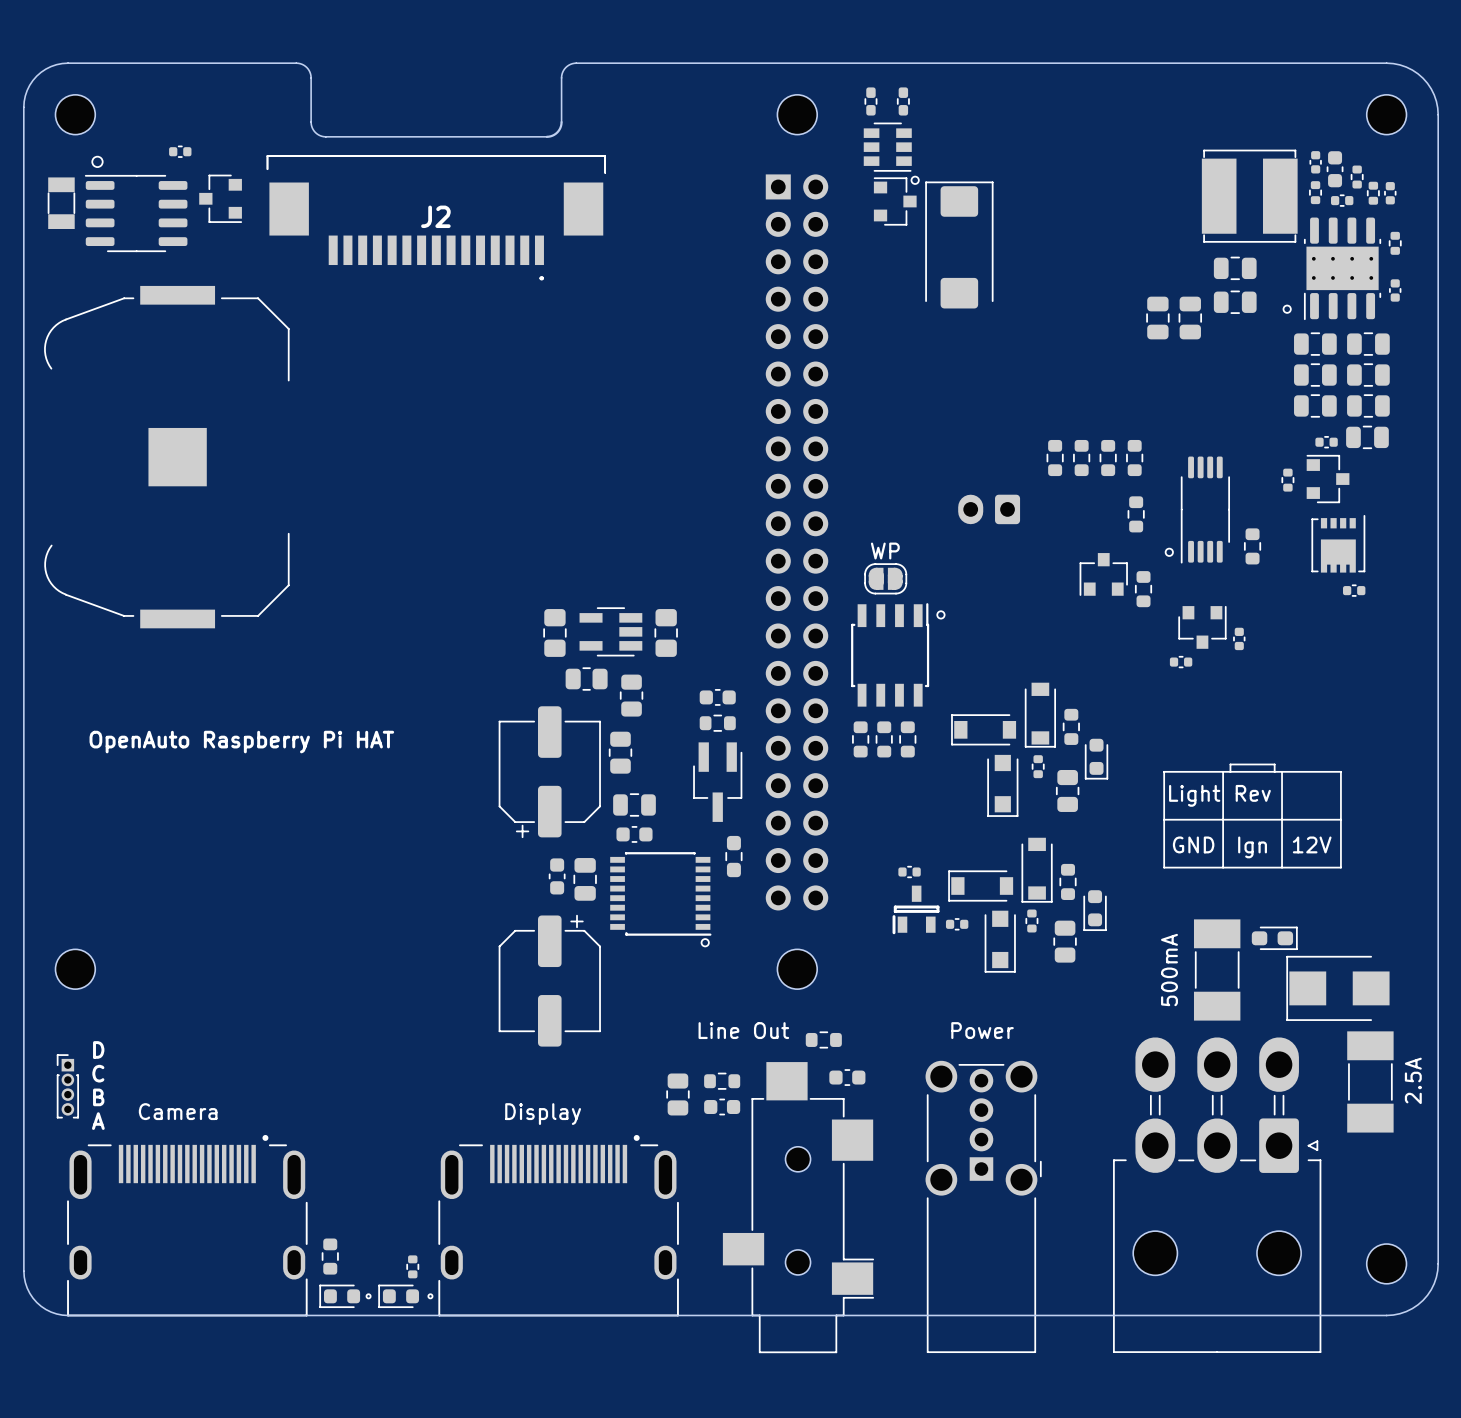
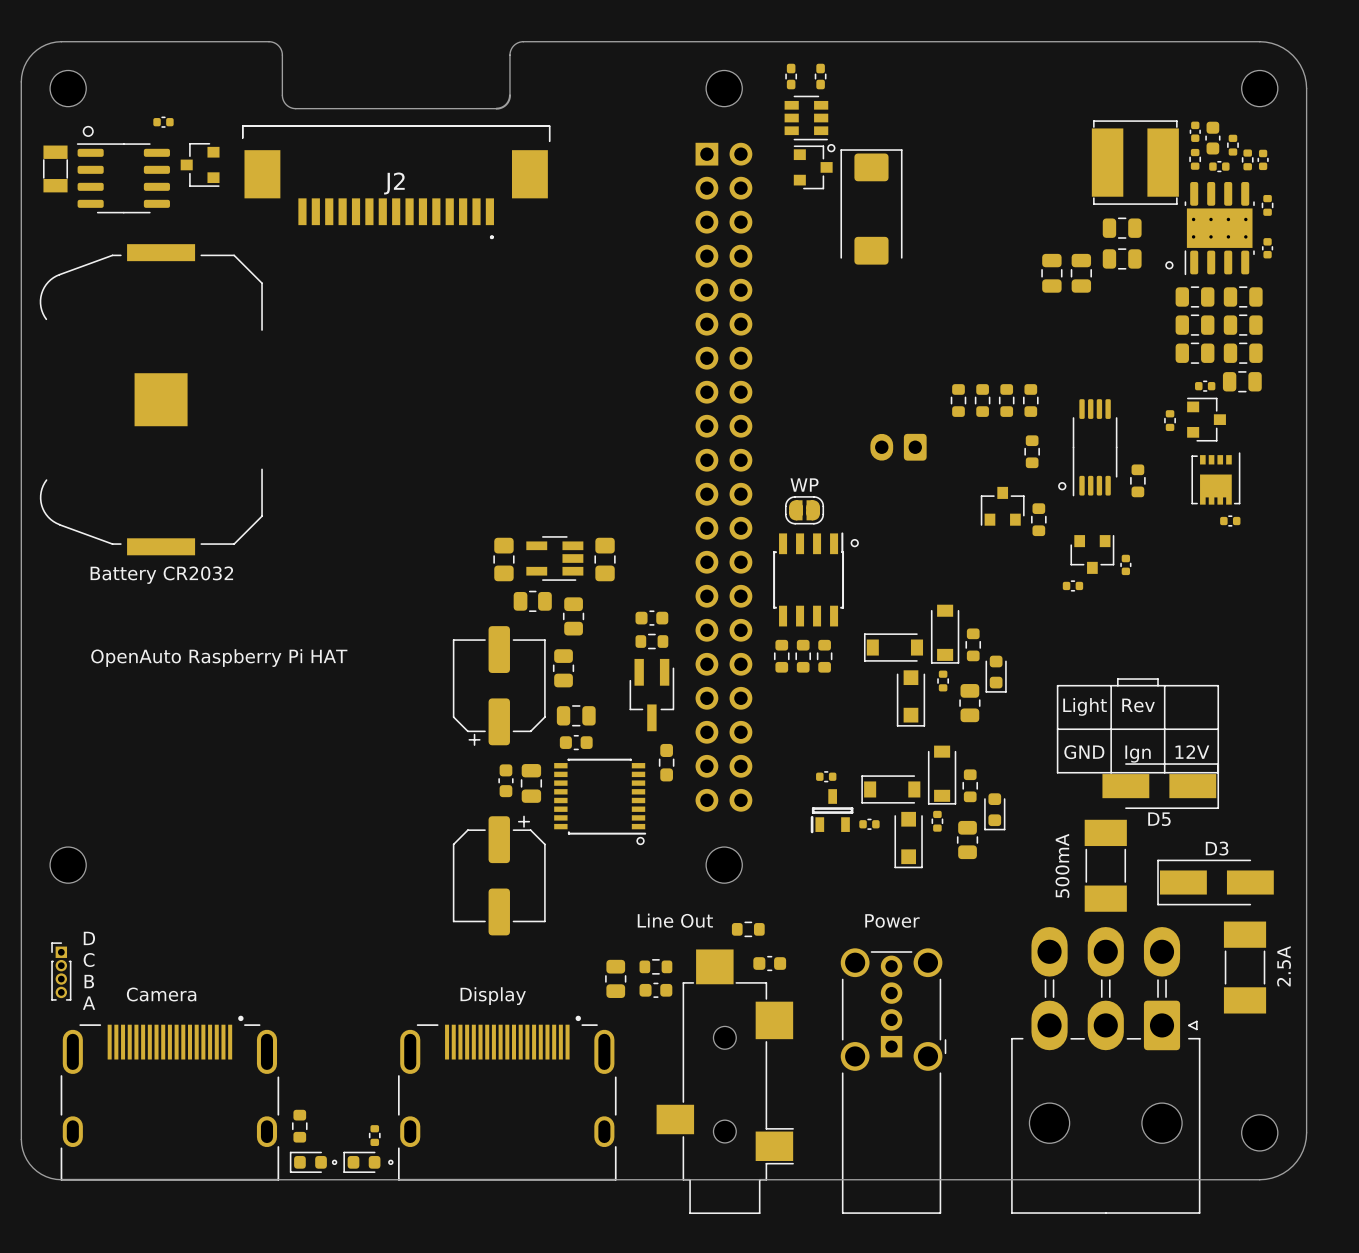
text: none -> Battery CR2032 (161, 575)
D5: none -> (1160, 786)
part: (1274, 938) -> none
part: (1337, 988) -> none
D3: none -> (1215, 882)

